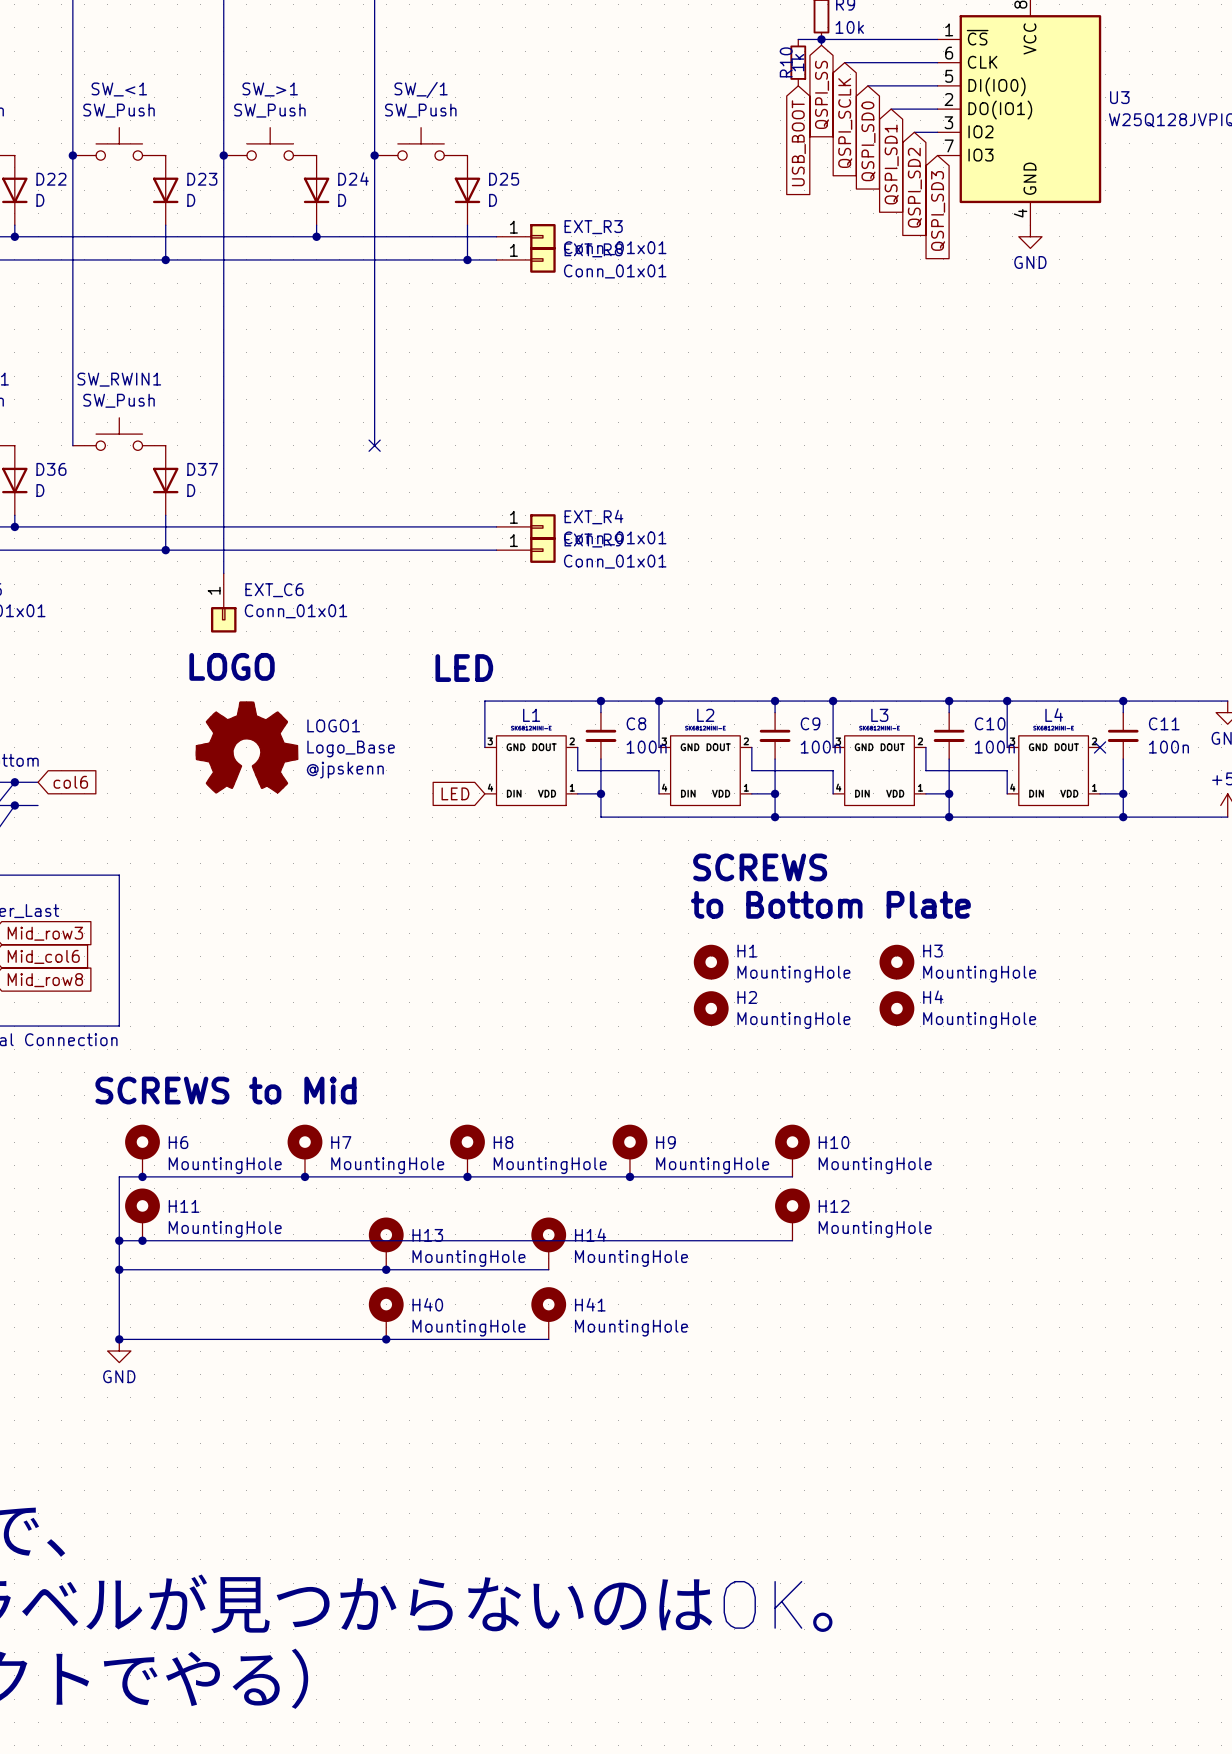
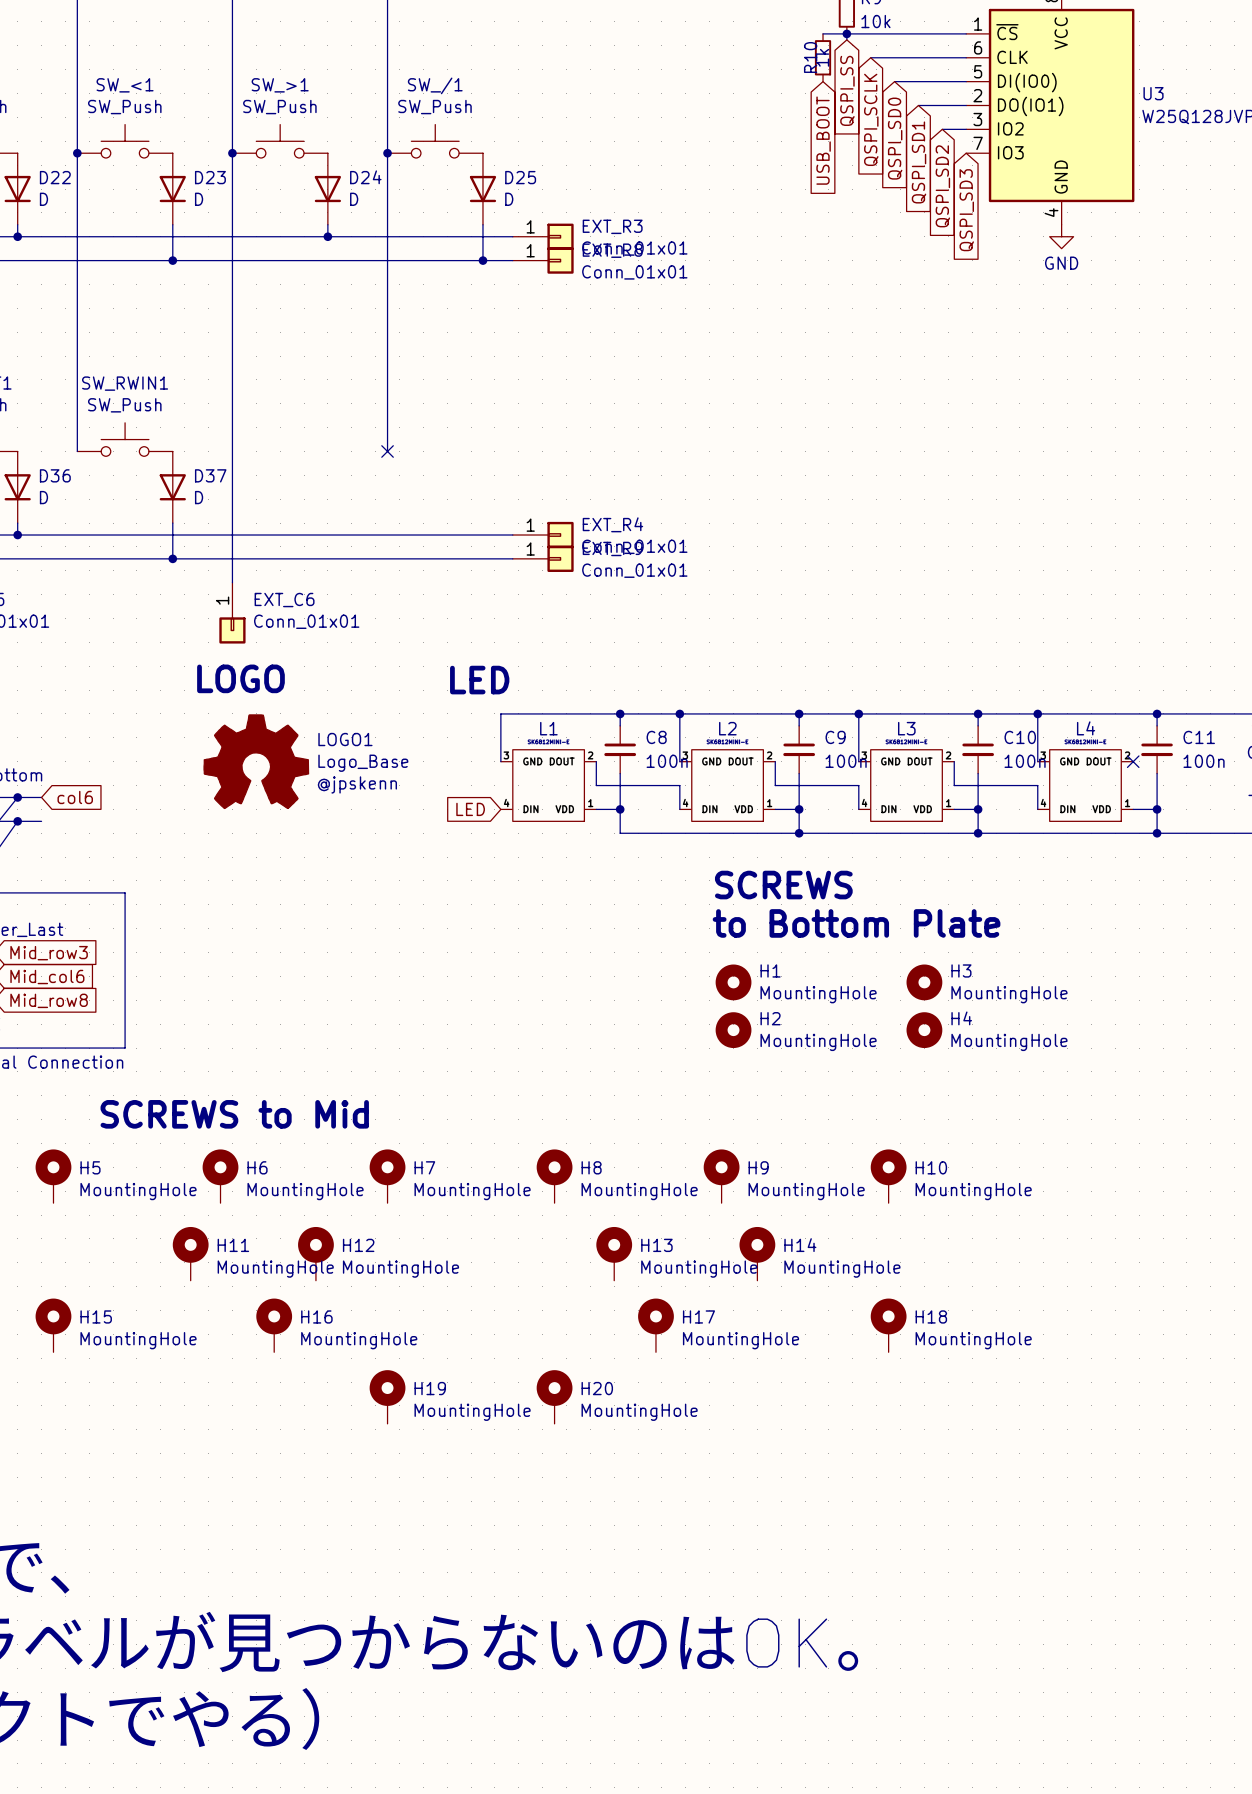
H5: none -> MountingHole (53, 1176)
H6 position: (142, 1150) -> (220, 1176)
H7 position: (304, 1150) -> (387, 1176)
H8 position: (467, 1150) -> (554, 1176)
H9 position: (629, 1150) -> (721, 1176)
H10 position: (792, 1150) -> (888, 1176)
junction: (142, 1176) -> none
junction: (304, 1176) -> none
junction: (467, 1176) -> none
junction: (629, 1176) -> none
wire: (792, 1176) (119, 1176) (119, 1339) (548, 1339) -> none
H11 position: (142, 1214) -> (190, 1253)
H12 position: (792, 1214) -> (315, 1253)
wire: (119, 1240) (792, 1240) -> none
junction: (119, 1240) -> none
junction: (142, 1240) -> none
H13 position: (386, 1243) -> (614, 1253)
H14 position: (548, 1243) -> (757, 1253)
wire: (119, 1269) (548, 1269) -> none
junction: (119, 1269) -> none
junction: (386, 1269) -> none
H15: none -> MountingHole (53, 1325)
H16: none -> MountingHole (274, 1325)
H17: none -> MountingHole (655, 1325)
H18: none -> MountingHole (888, 1325)
H40: MountingHole (386, 1313) -> none
H41: MountingHole (548, 1313) -> none
junction: (119, 1339) -> none
junction: (386, 1339) -> none
power symbol: GND (119, 1351) -> none
H19: none -> MountingHole (387, 1396)
H20: none -> MountingHole (554, 1396)

